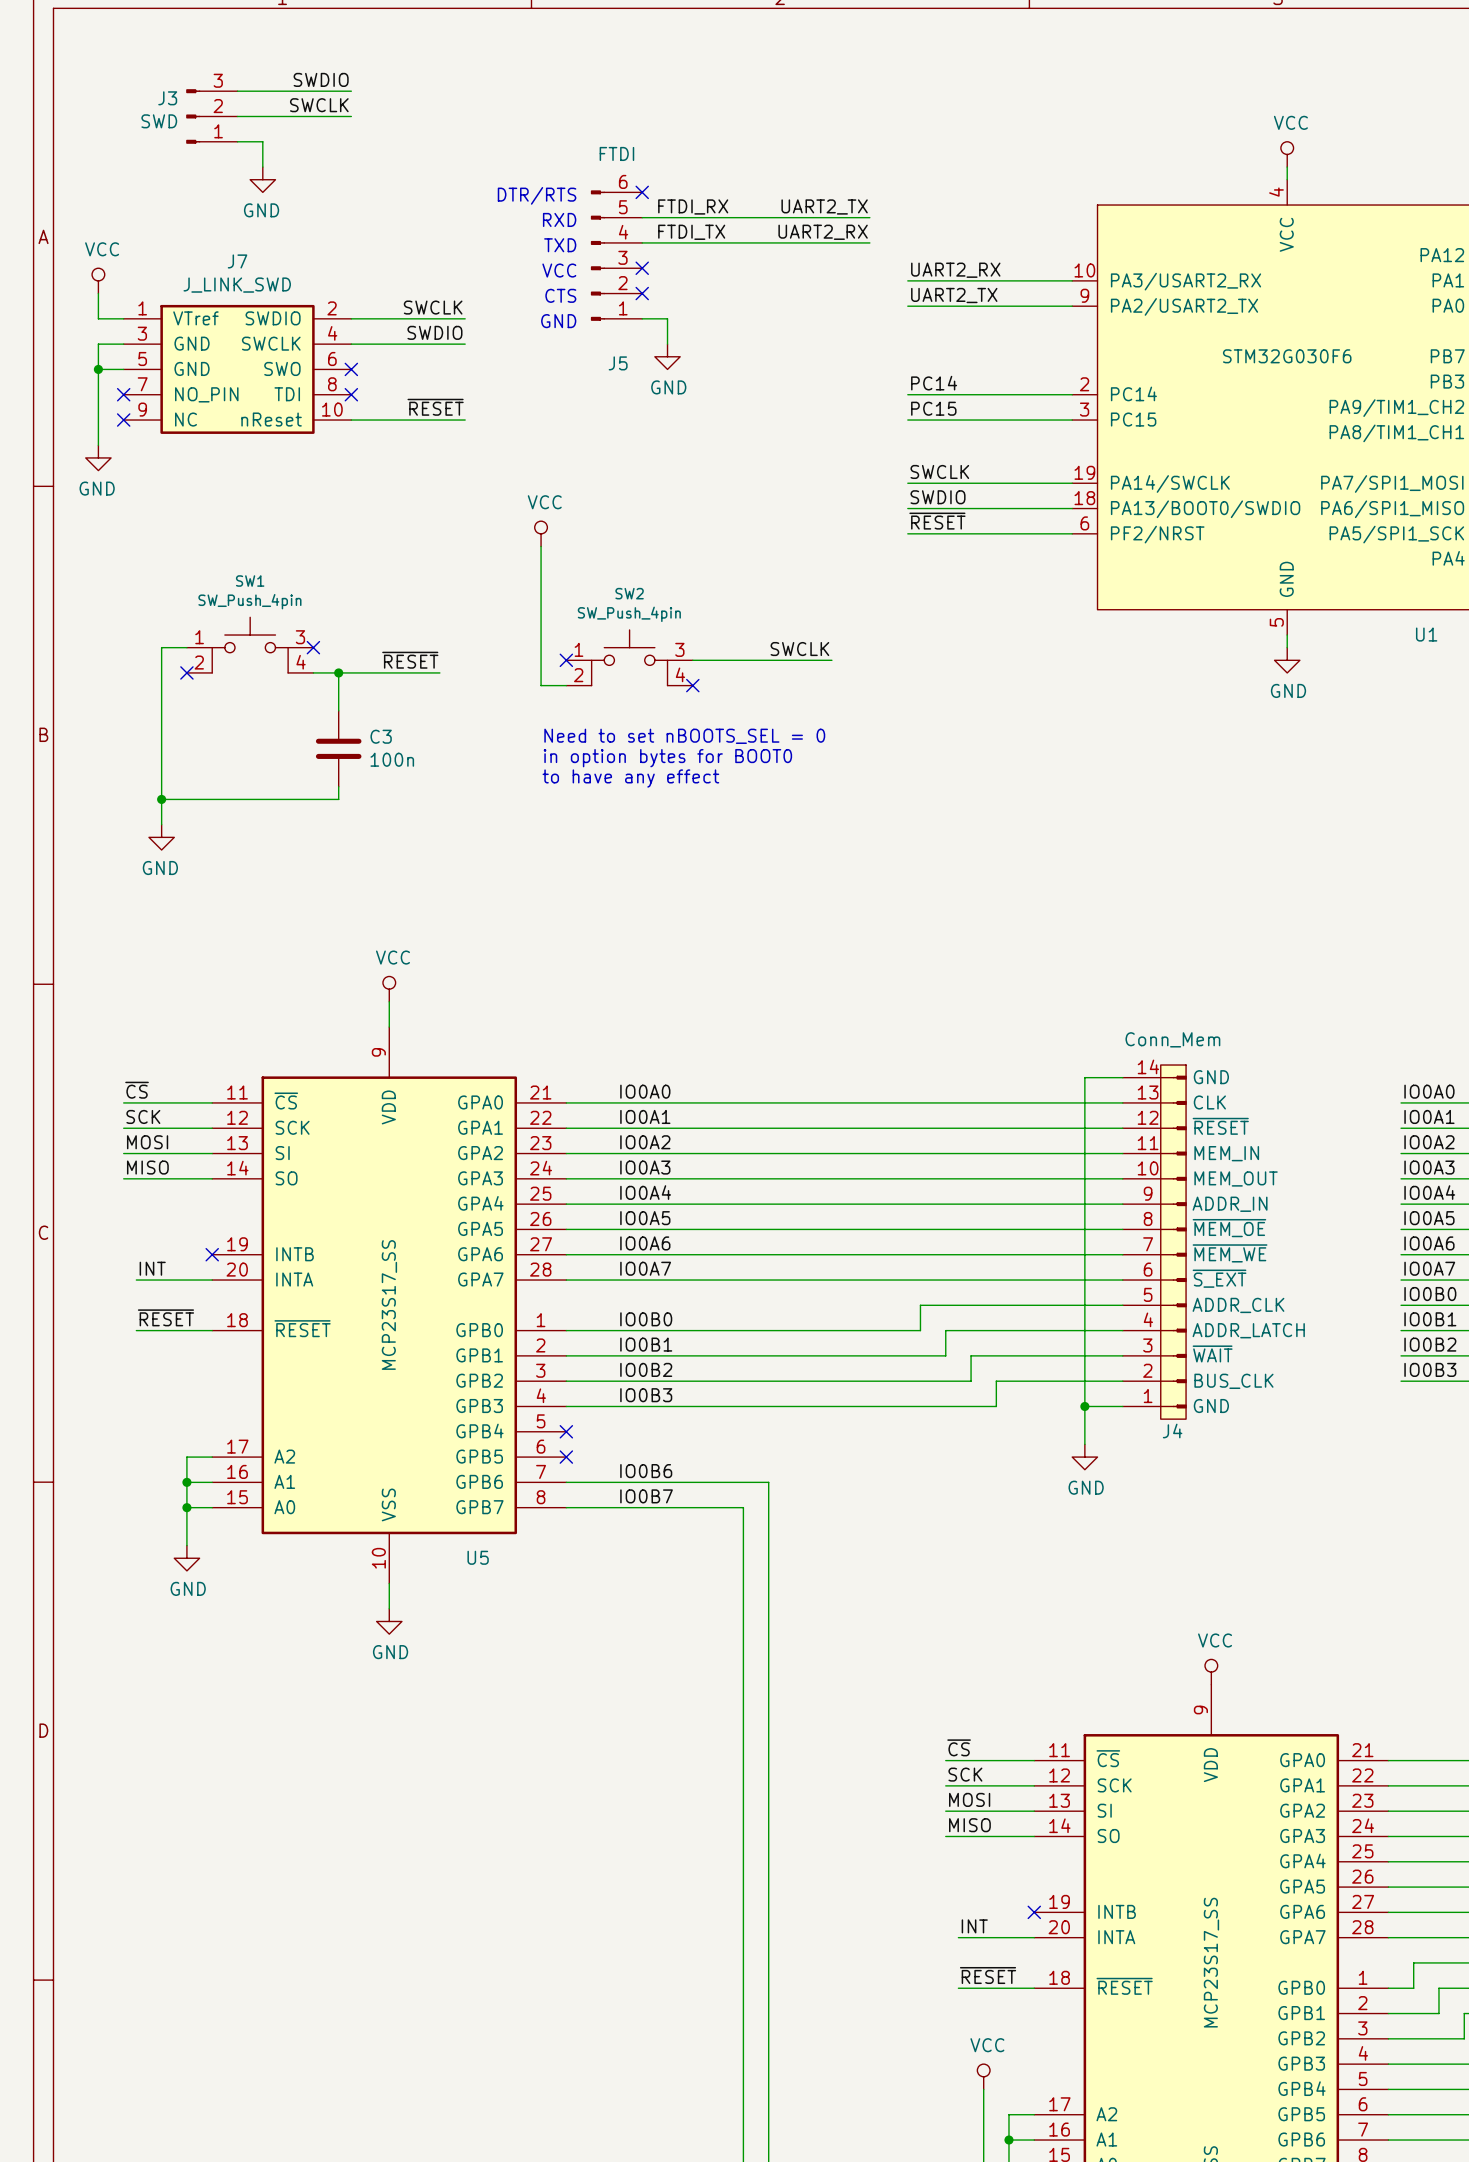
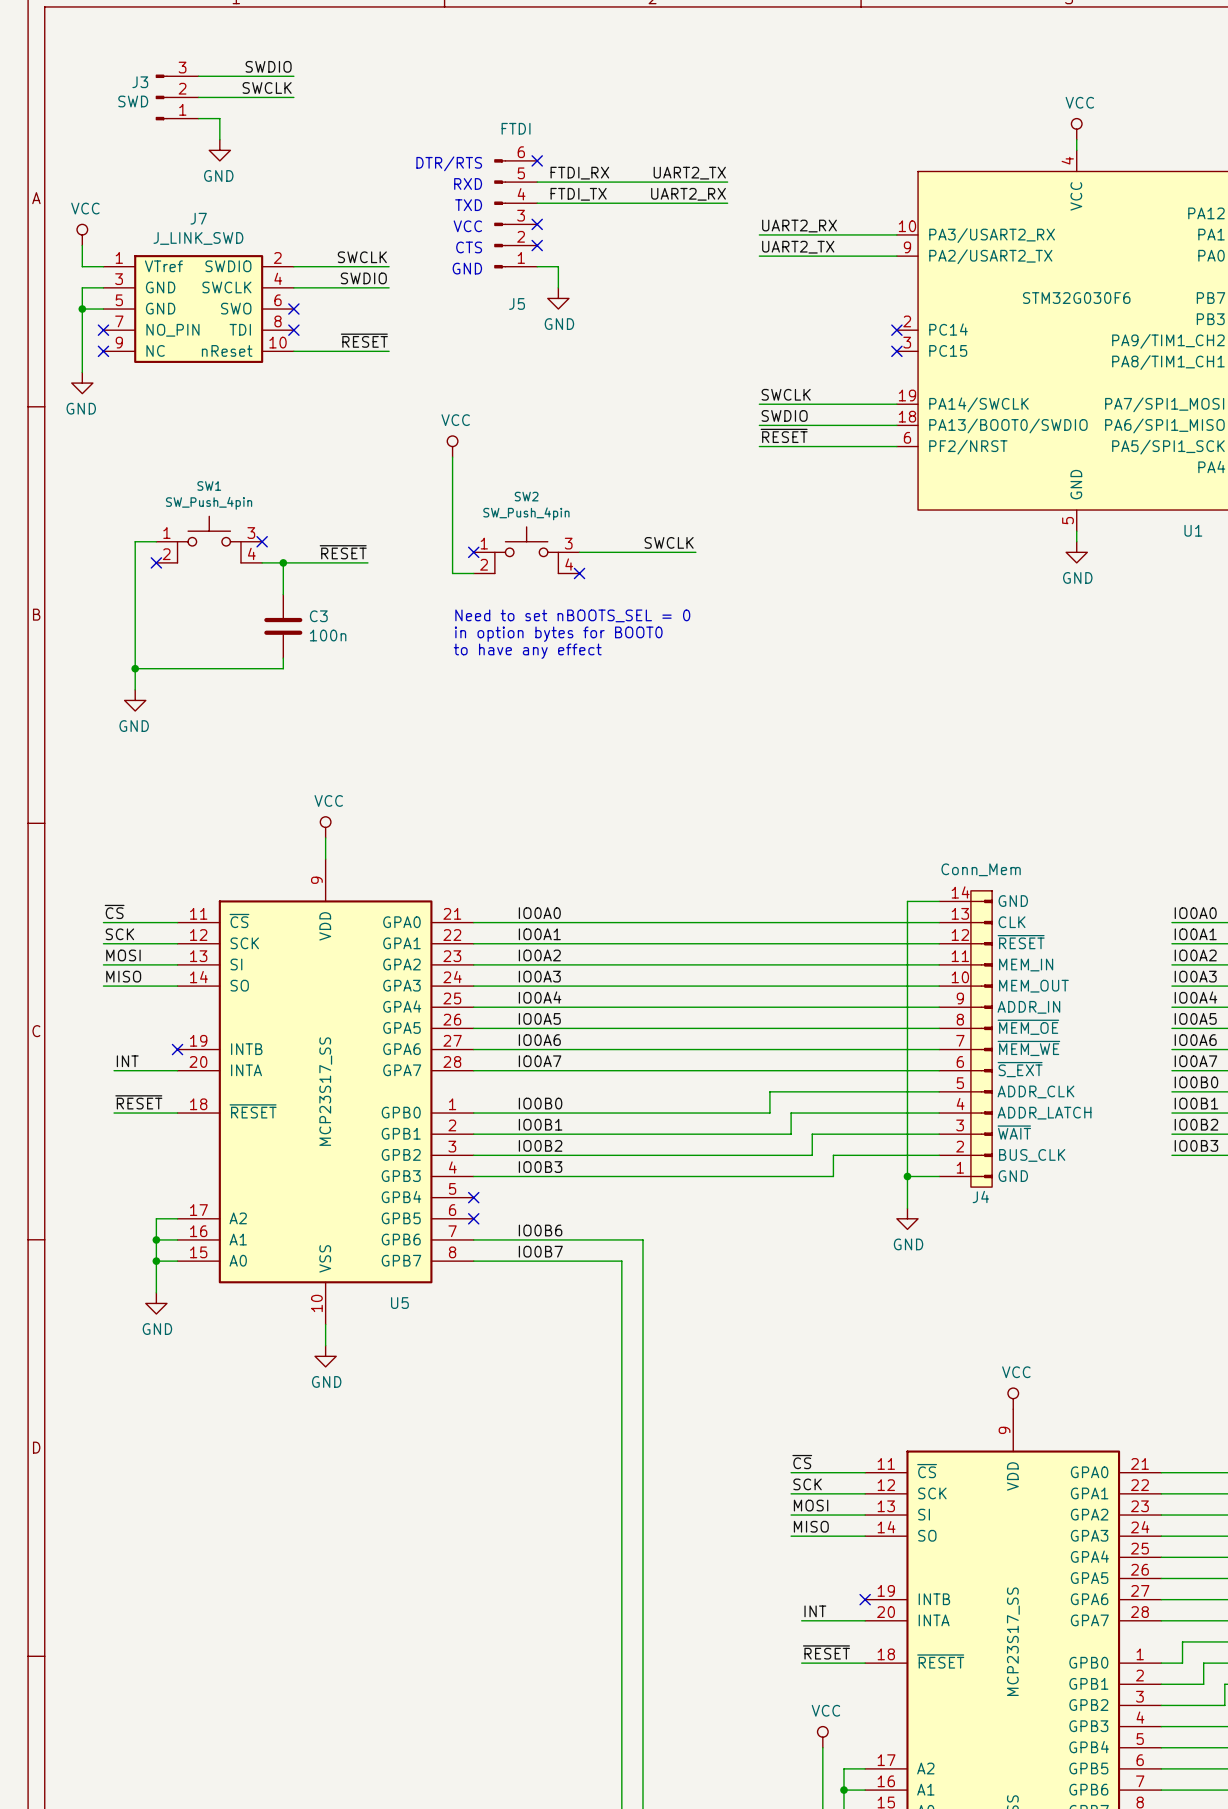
label: PC14 (934, 383) -> none
wire: (907, 394) (1072, 394) -> none
no-connect mark: none -> (896, 330)
label: PC15 (933, 408) -> none
wire: (907, 420) (1072, 420) -> none
no-connect mark: none -> (896, 351)

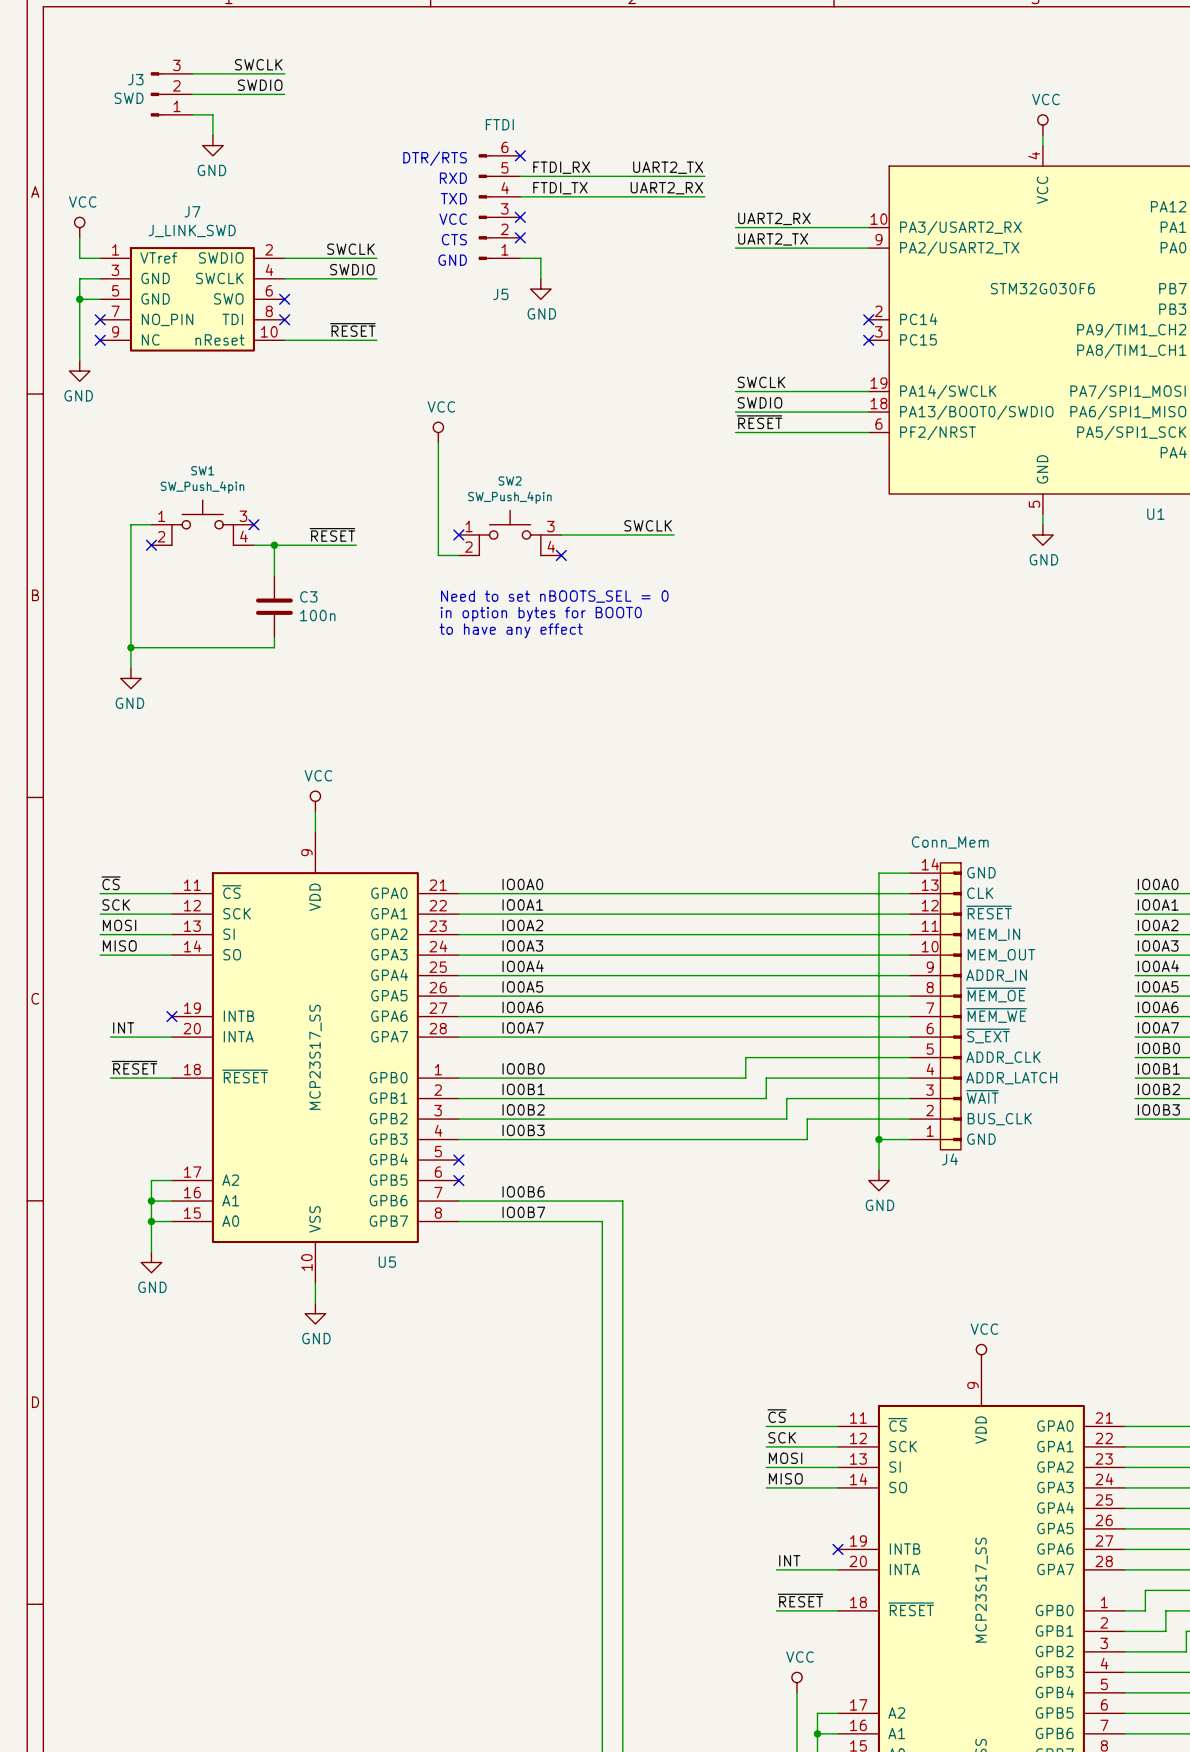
label: SWDIO (268, 66) -> SWCLK (258, 64)
label: SWCLK (267, 88) -> SWDIO (260, 85)

